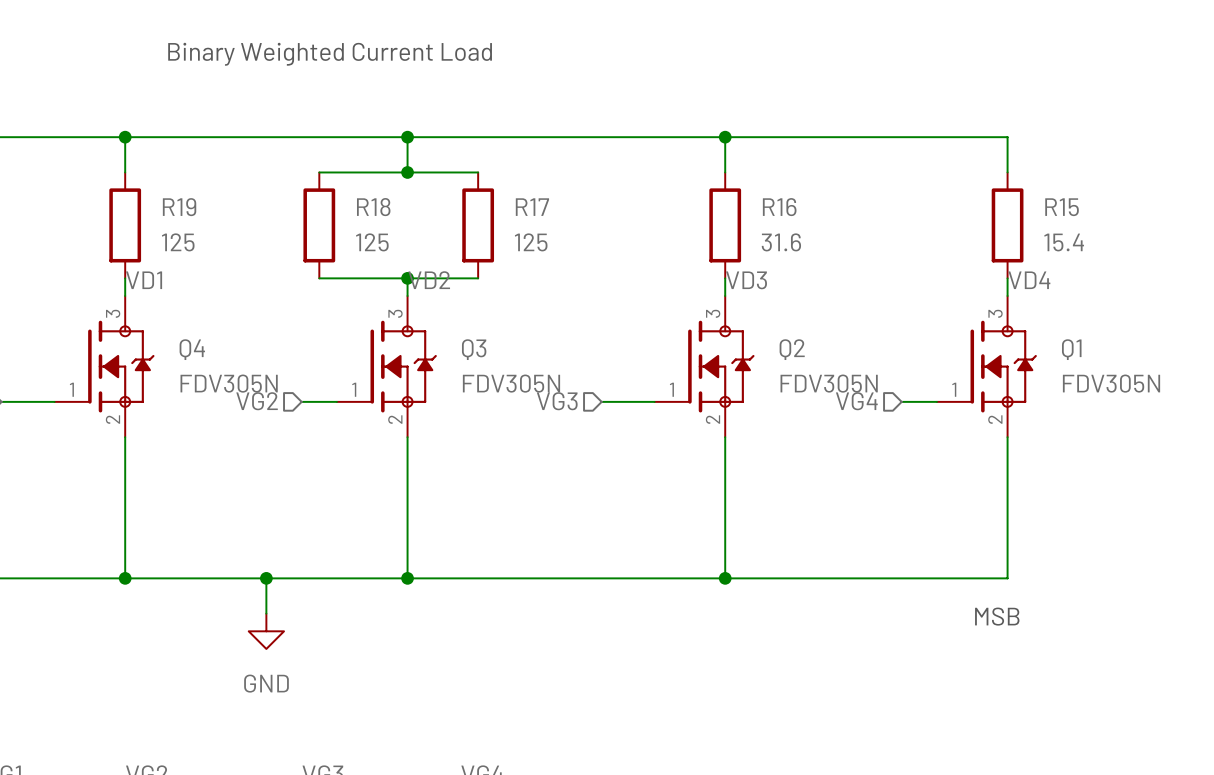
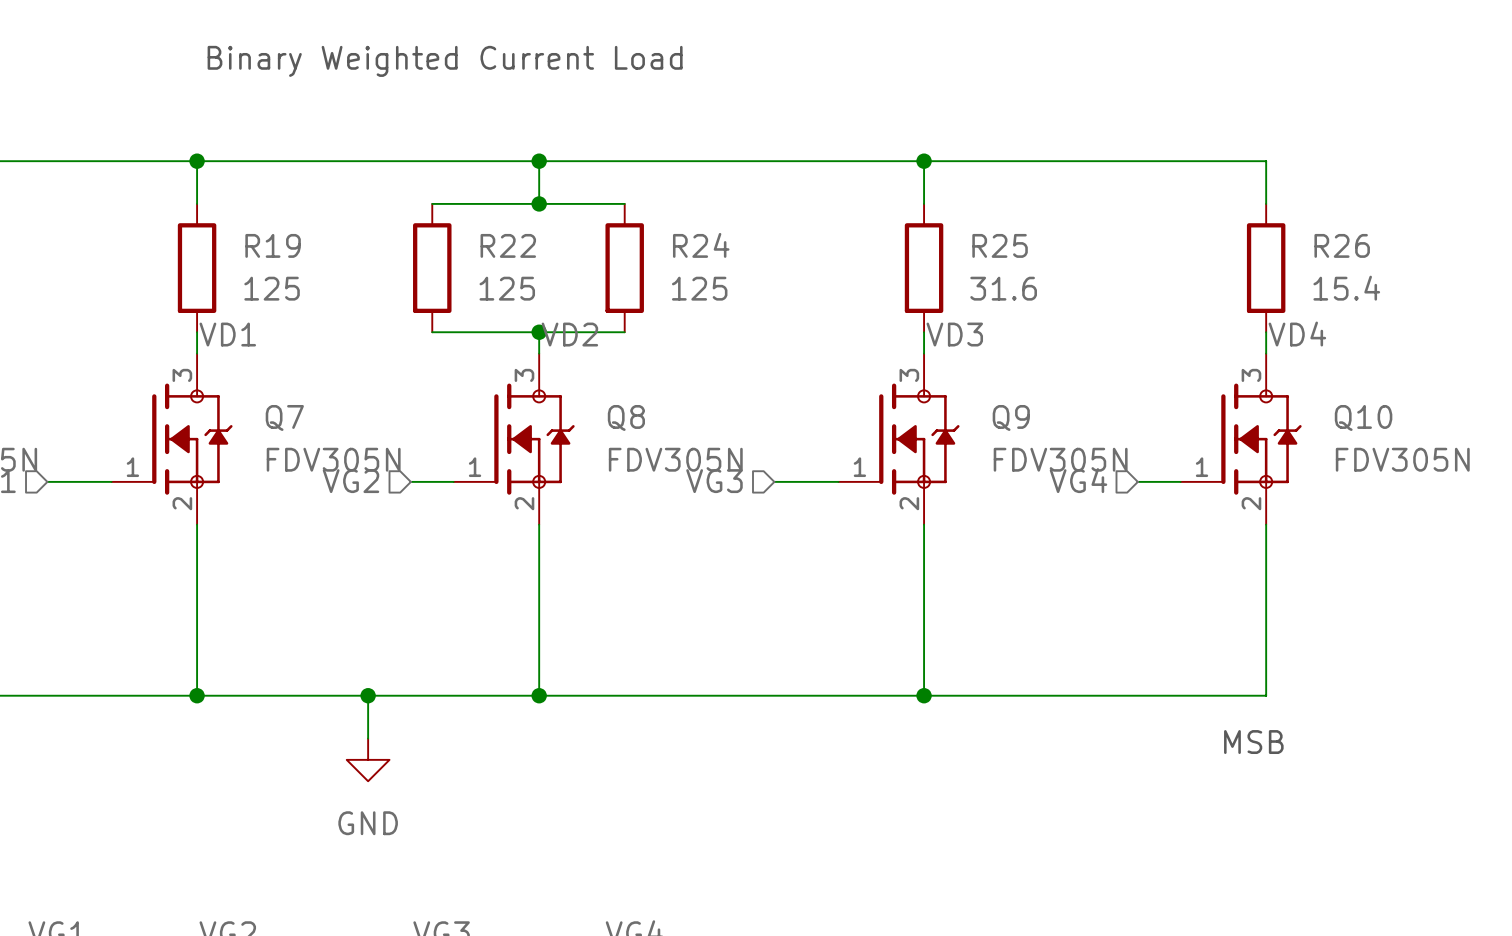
R18 name: R18 (373, 207) -> R22 (508, 245)
R17 name: R17 (532, 207) -> R24 (701, 245)
R16 name: R16 (779, 207) -> R25 (1000, 245)
R15 name: R15 (1062, 207) -> R26 (1342, 245)
Q4 name: Q4 (192, 349) -> Q7 (284, 417)
Q3 name: Q3 (474, 349) -> Q8 (626, 417)
Q2 name: Q2 (792, 349) -> Q9 (1011, 417)
Q1 name: Q1 (1071, 349) -> Q10 (1363, 417)

